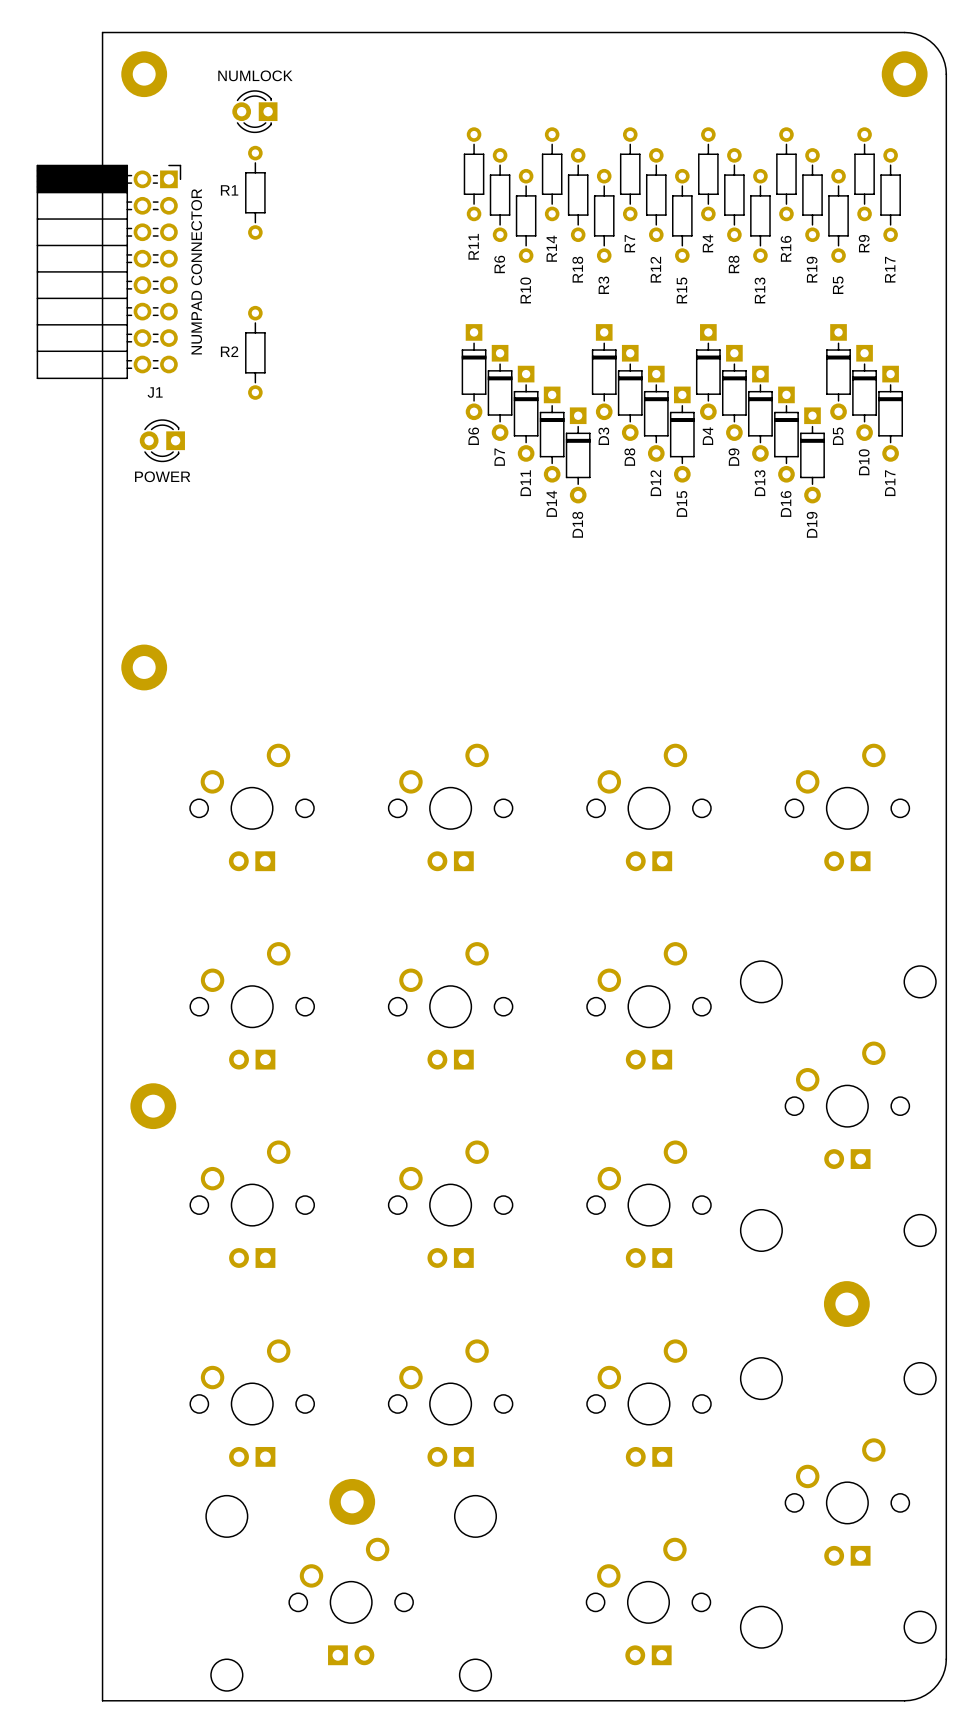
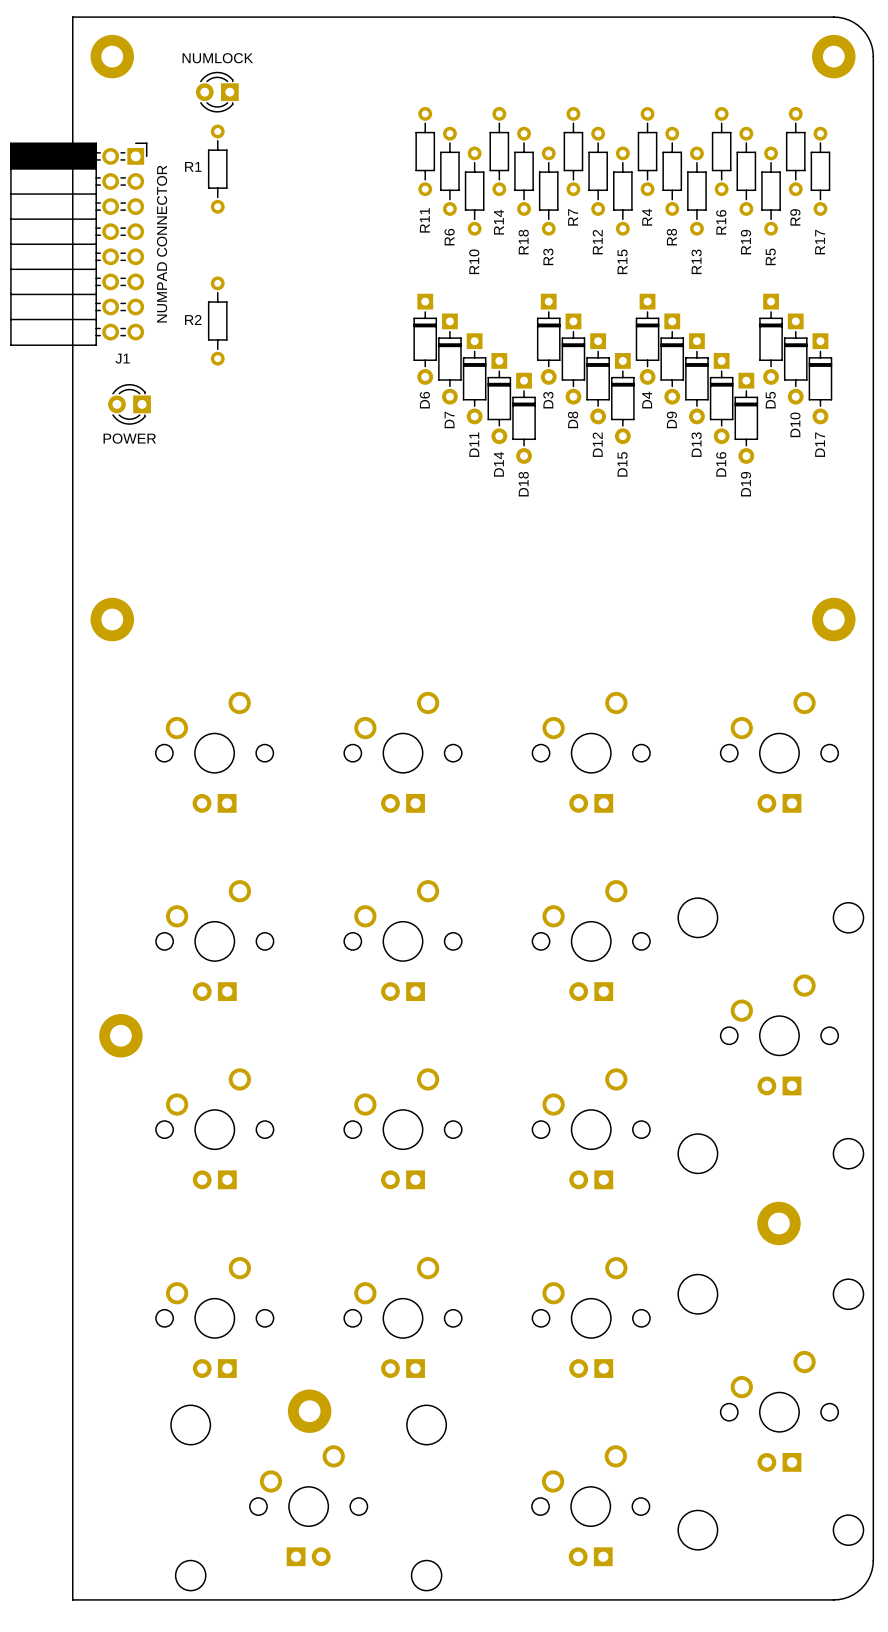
part: none -> (833, 619)

